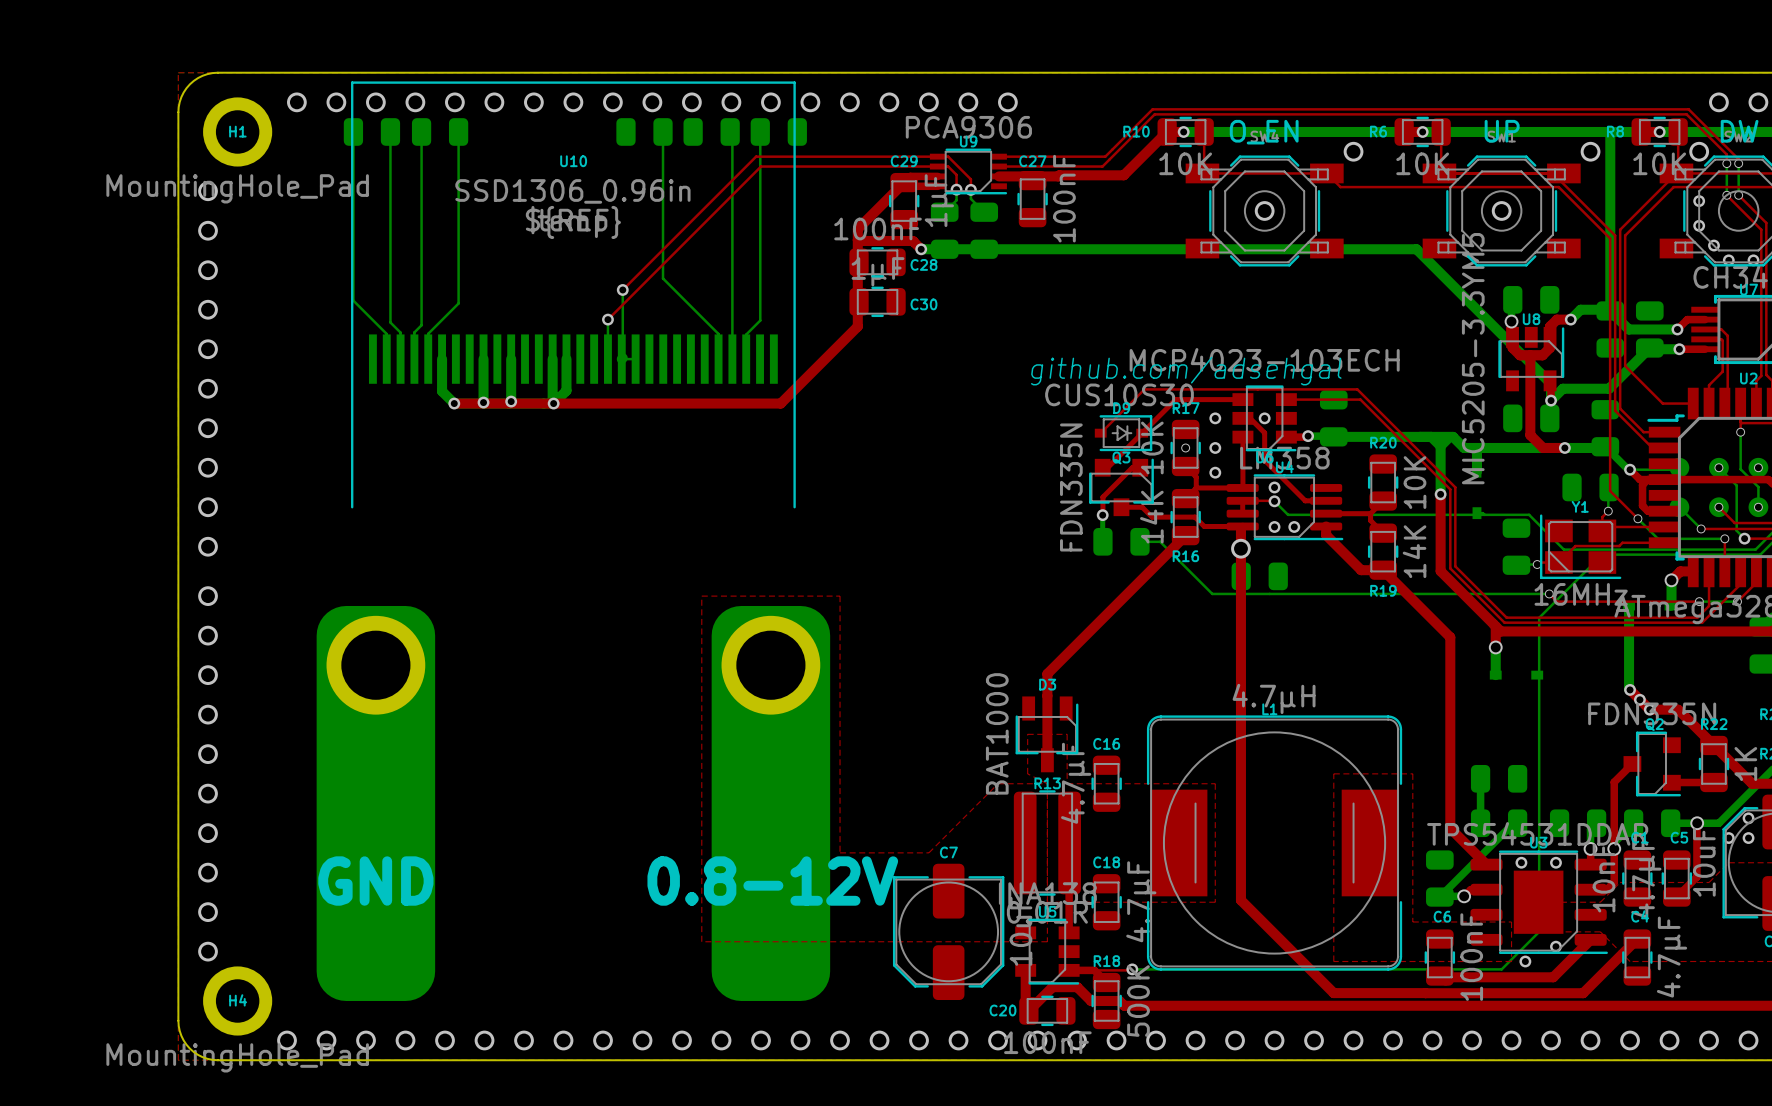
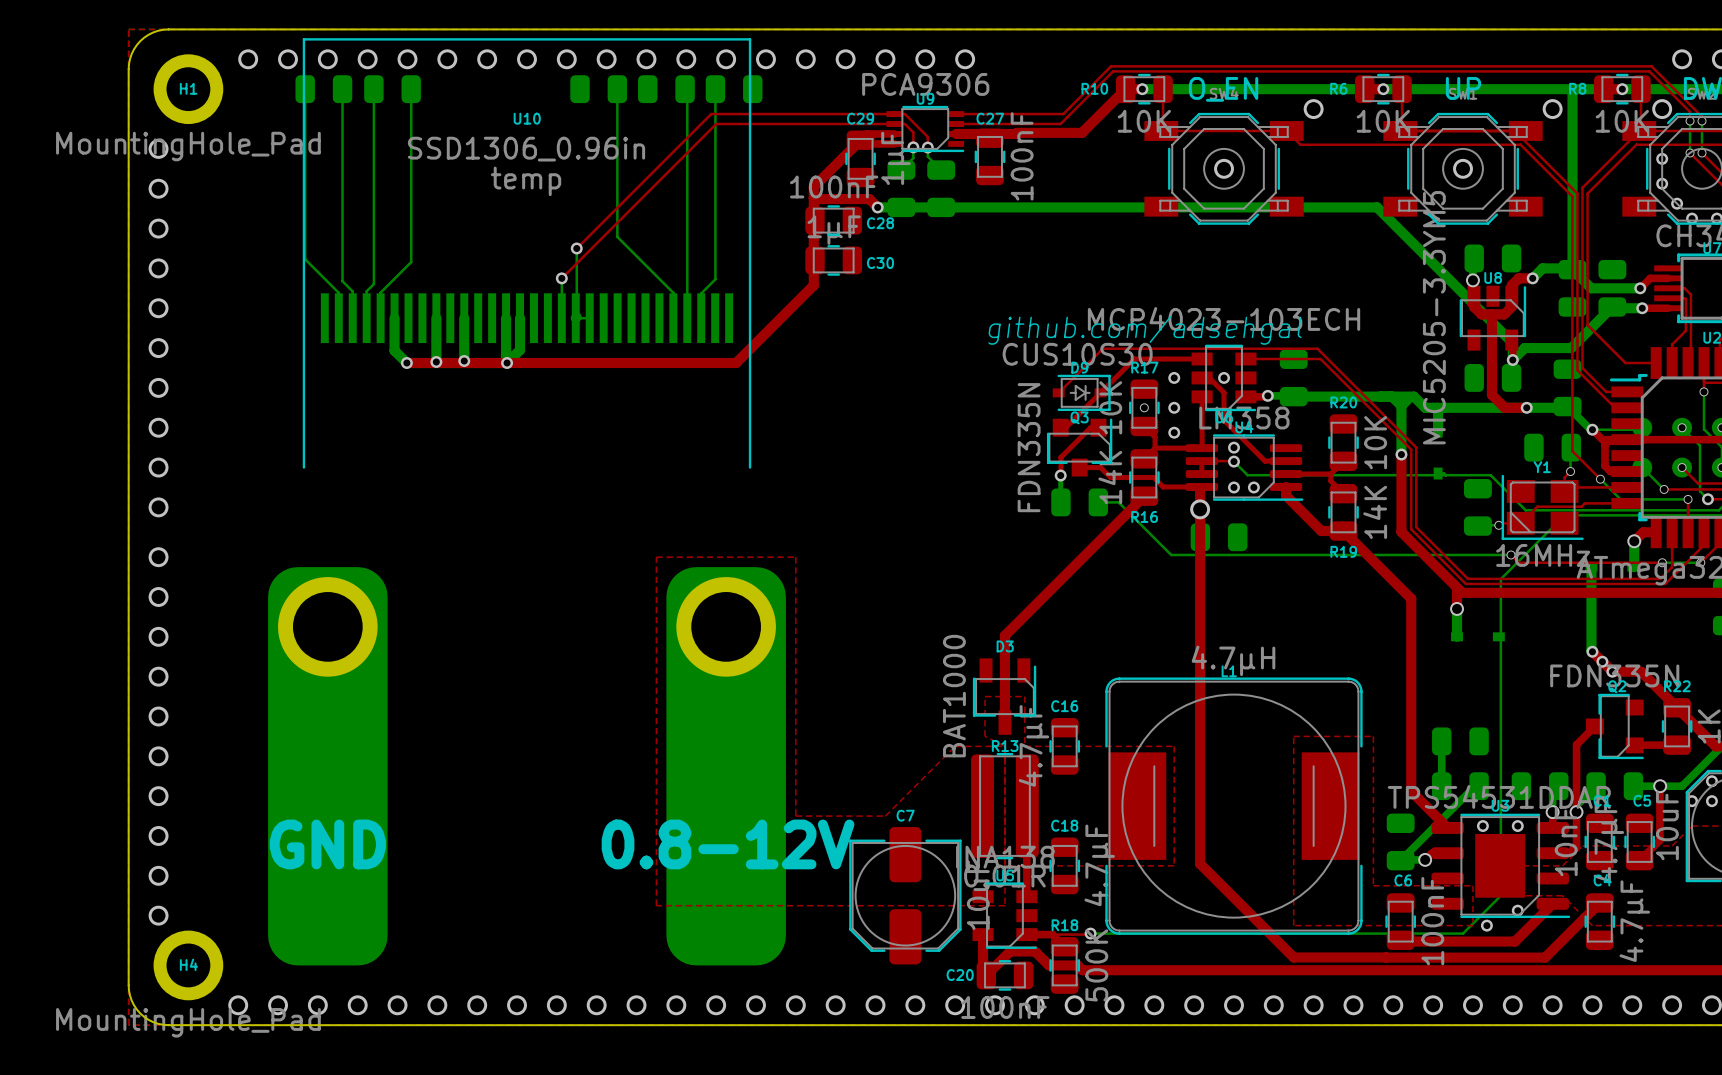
U10 footprint: [351, 81, 796, 513] -> [302, 38, 752, 473]

